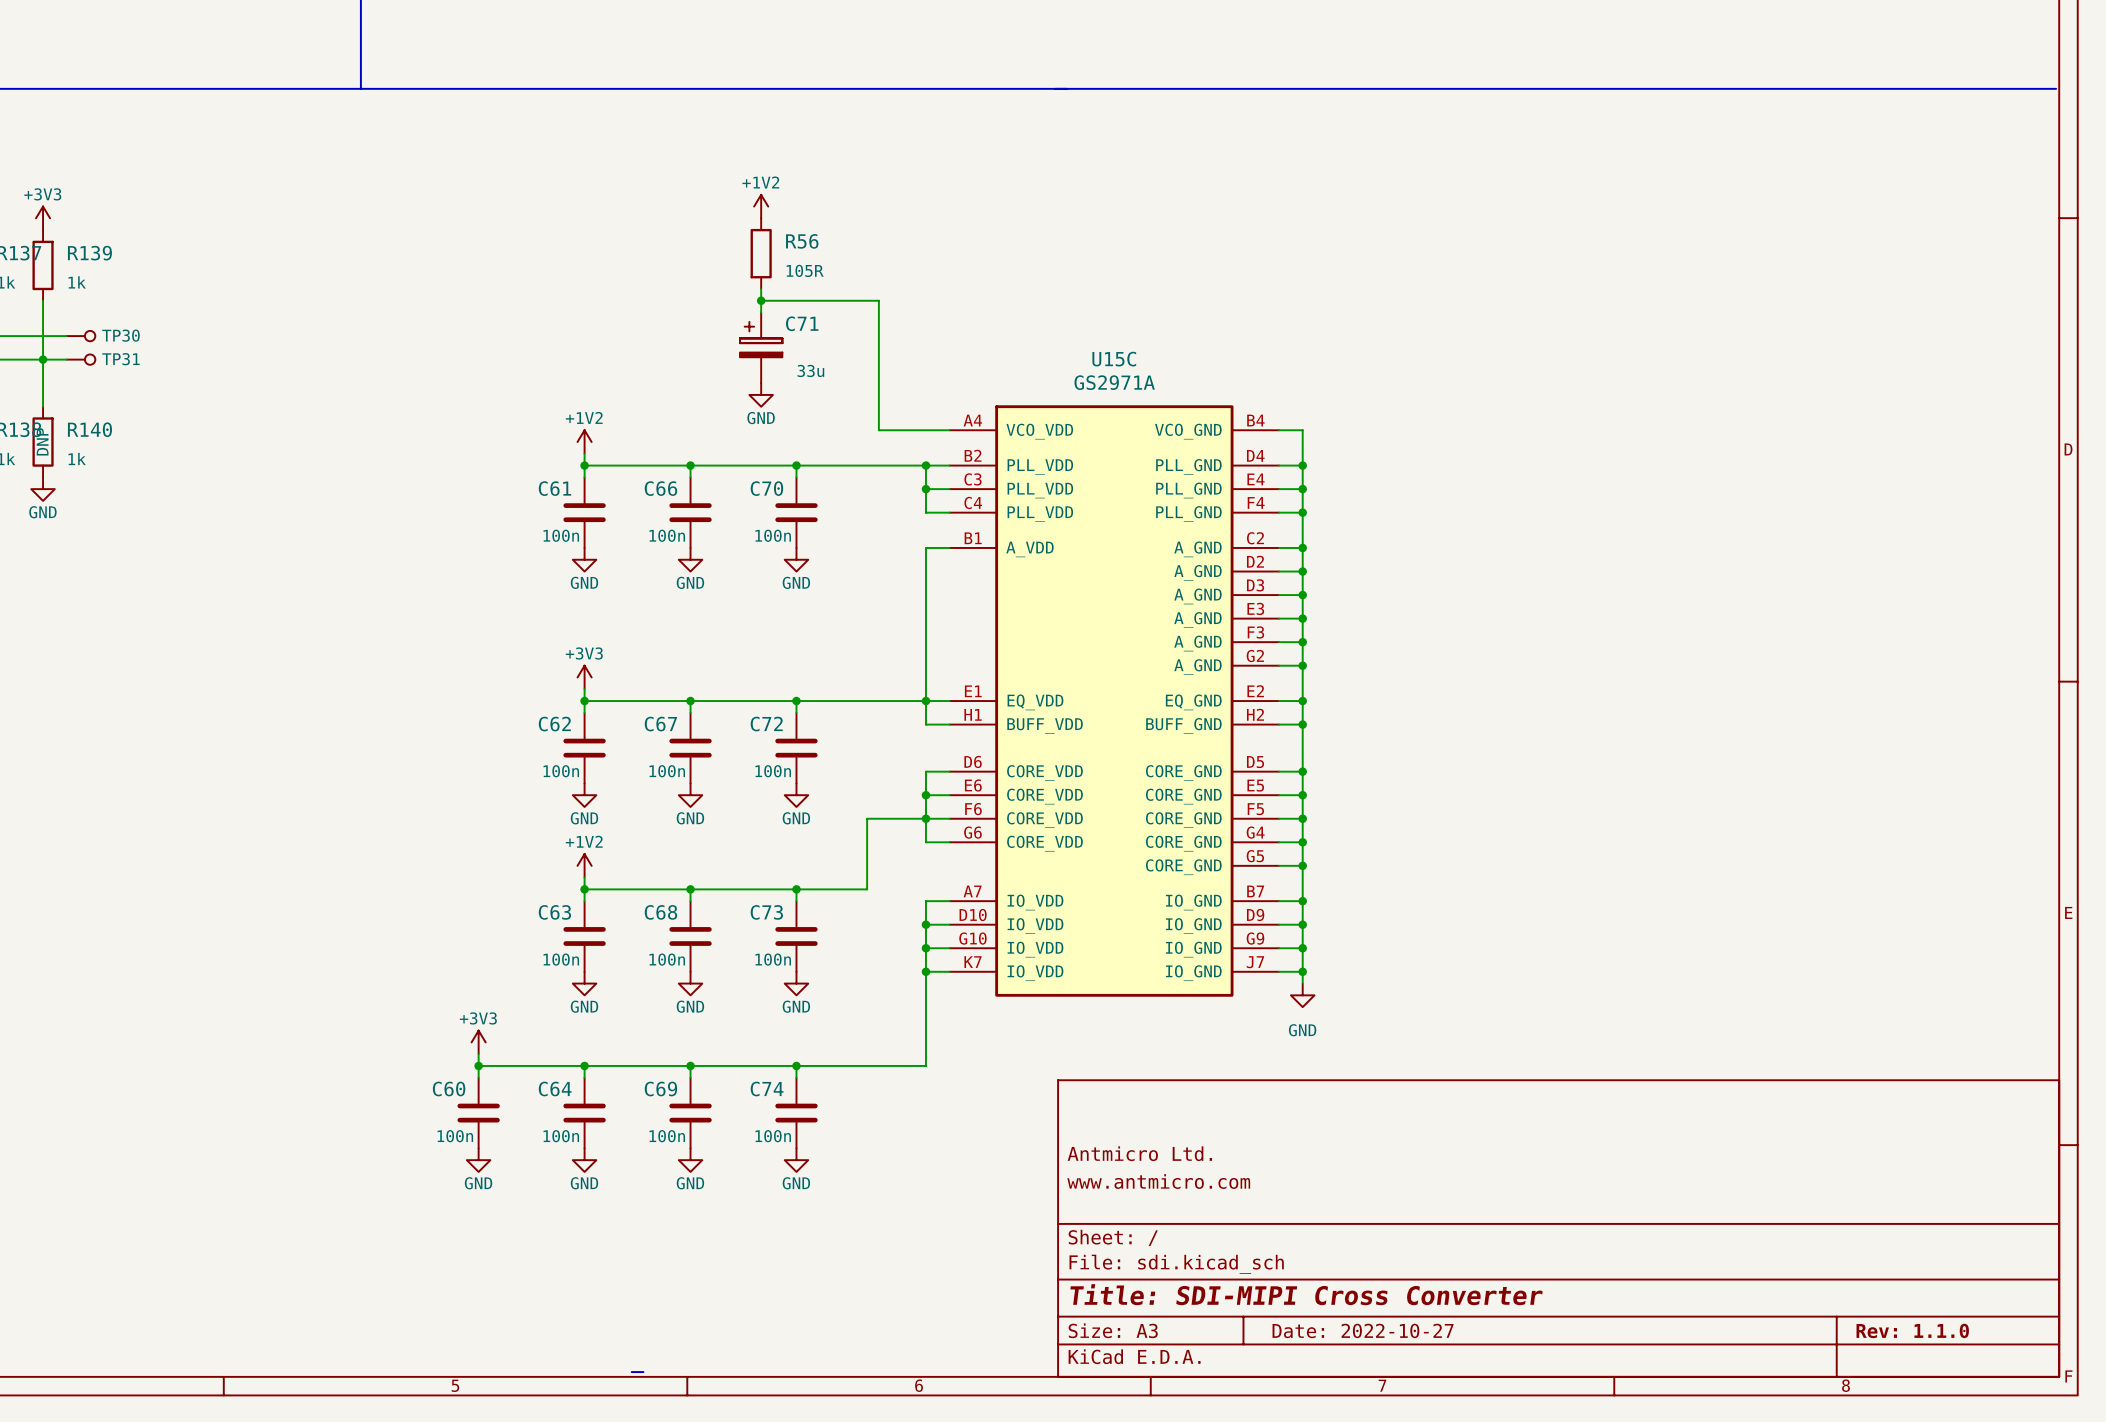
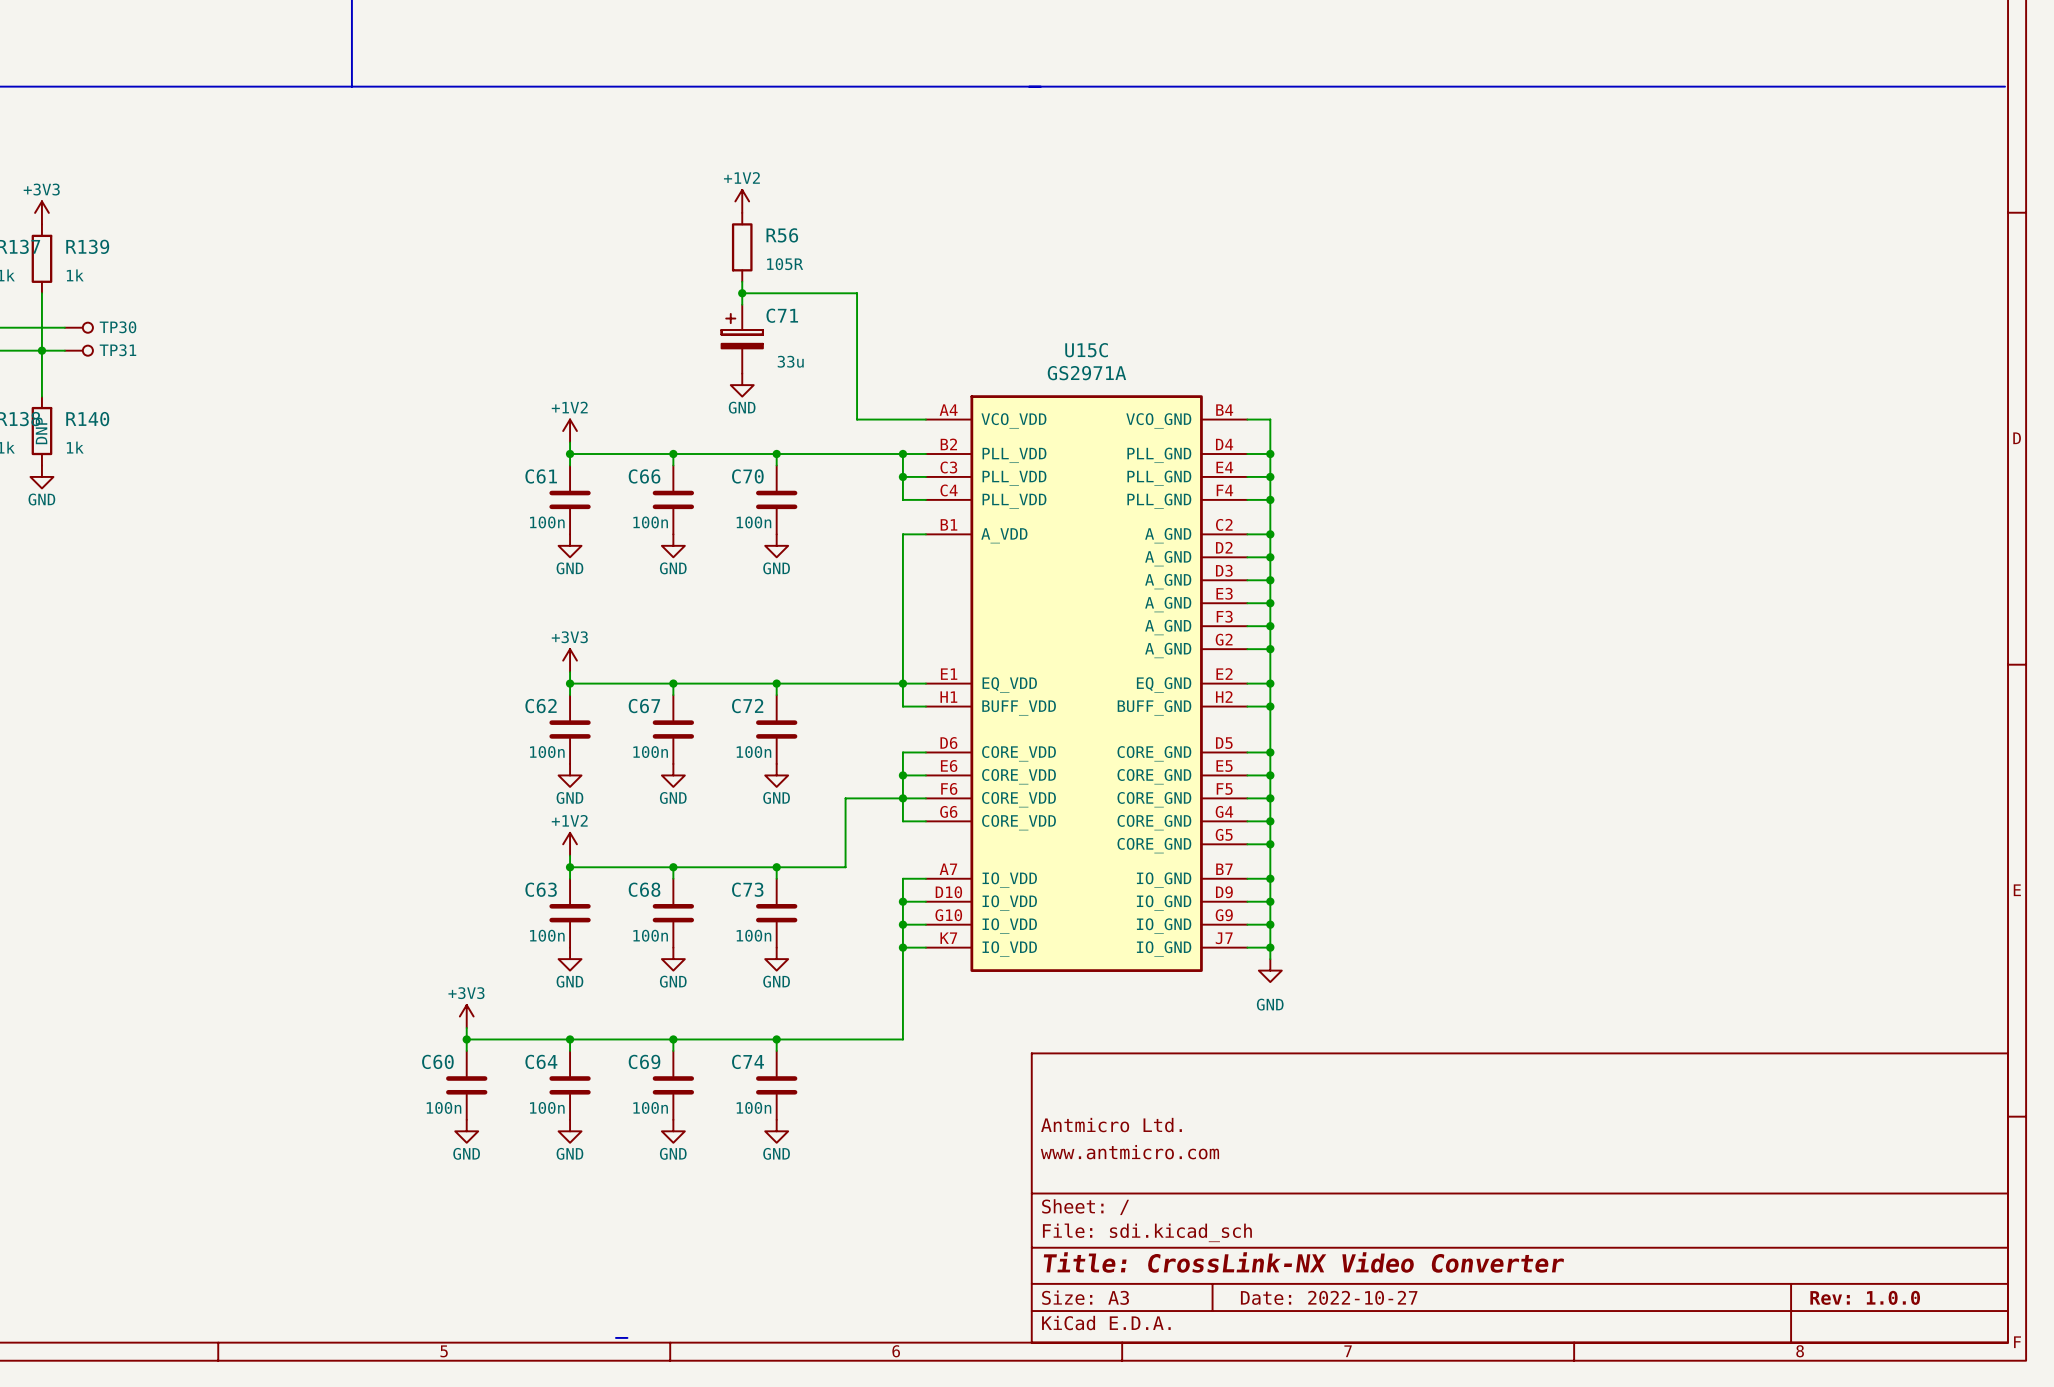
title block: Title: SDI-MIPI Cross Converter (1306, 1294) -> Title: CrossLink-NX Video Converter (1303, 1262)
title block: Rev: 1.1.0 (1912, 1330) -> Rev: 1.0.0 (1865, 1297)

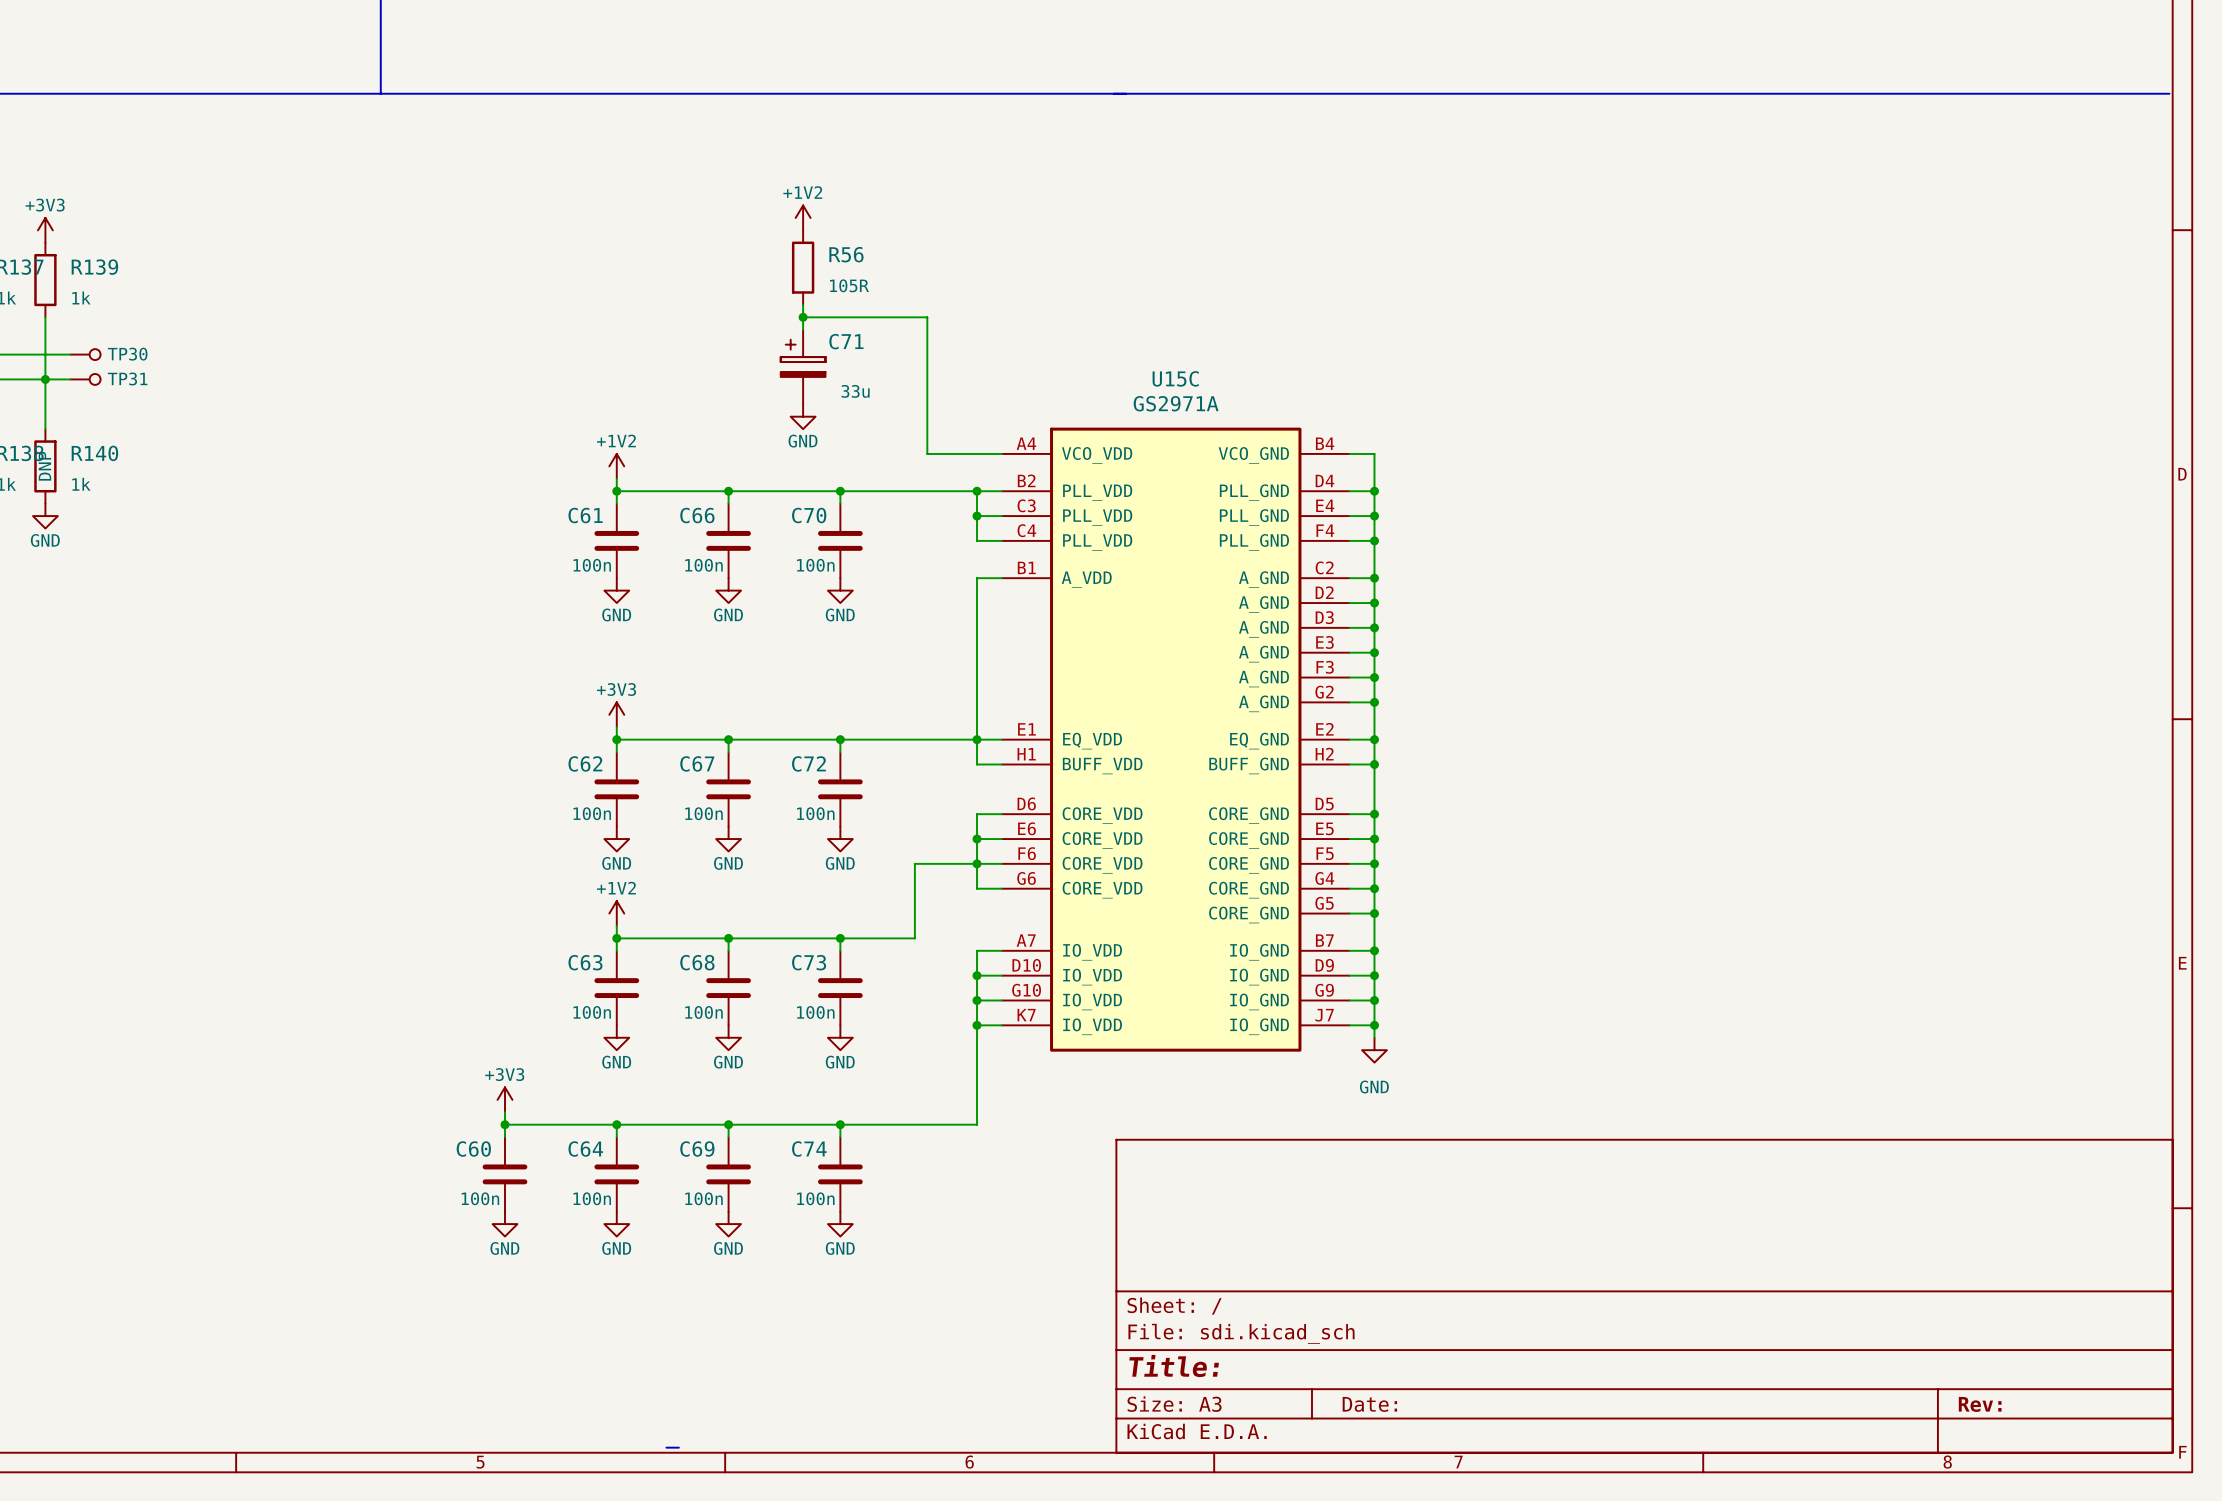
title block: Antmicro Ltd. (1111, 1125) -> none
title block: www.antmicro.com (1129, 1152) -> none
title block: Title: CrossLink-NX Video Converter (1303, 1262) -> Title: (1174, 1365)
title block: Date: 2022-10-27 (1329, 1297) -> Date: (1369, 1404)
title block: Rev: 1.0.0 (1865, 1297) -> Rev: (1980, 1404)

